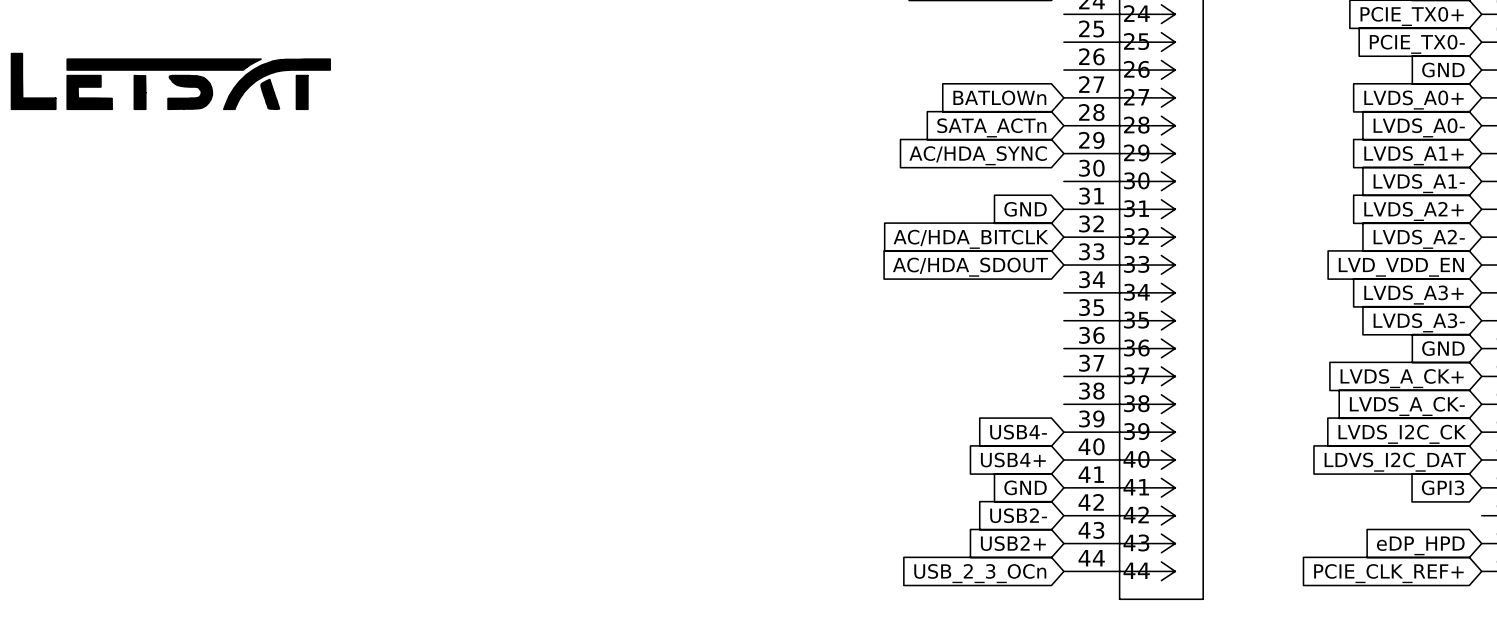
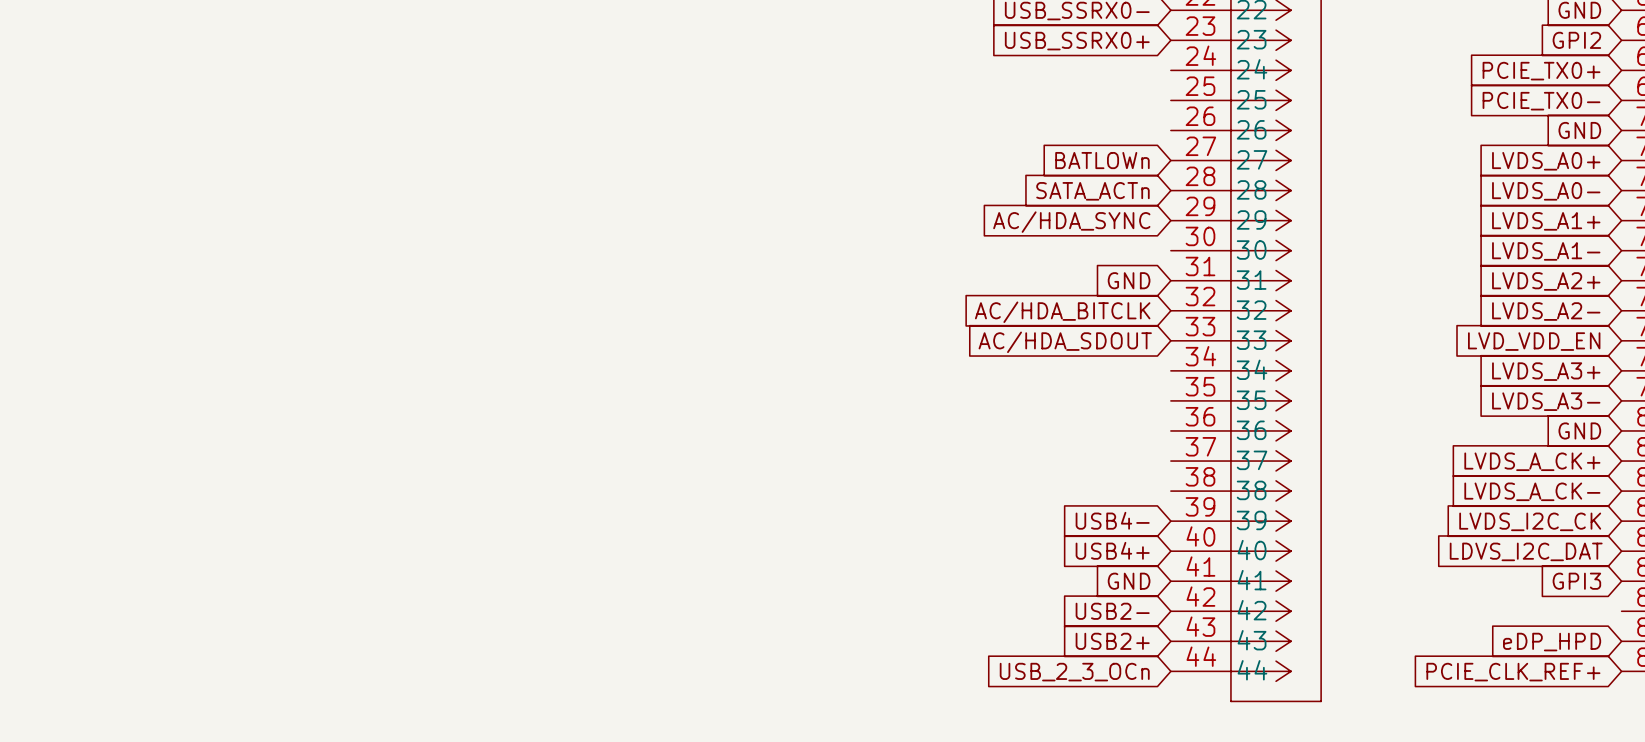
part: (170, 81) -> none

